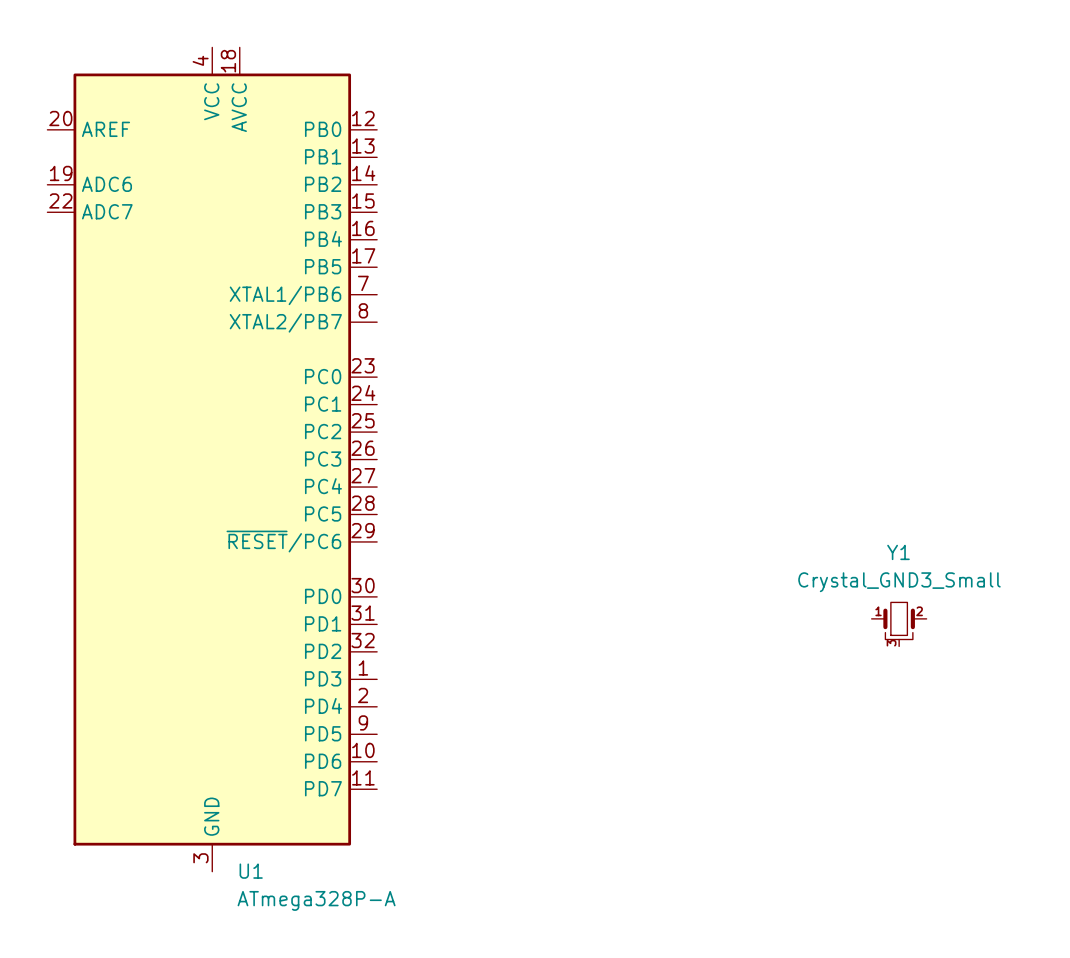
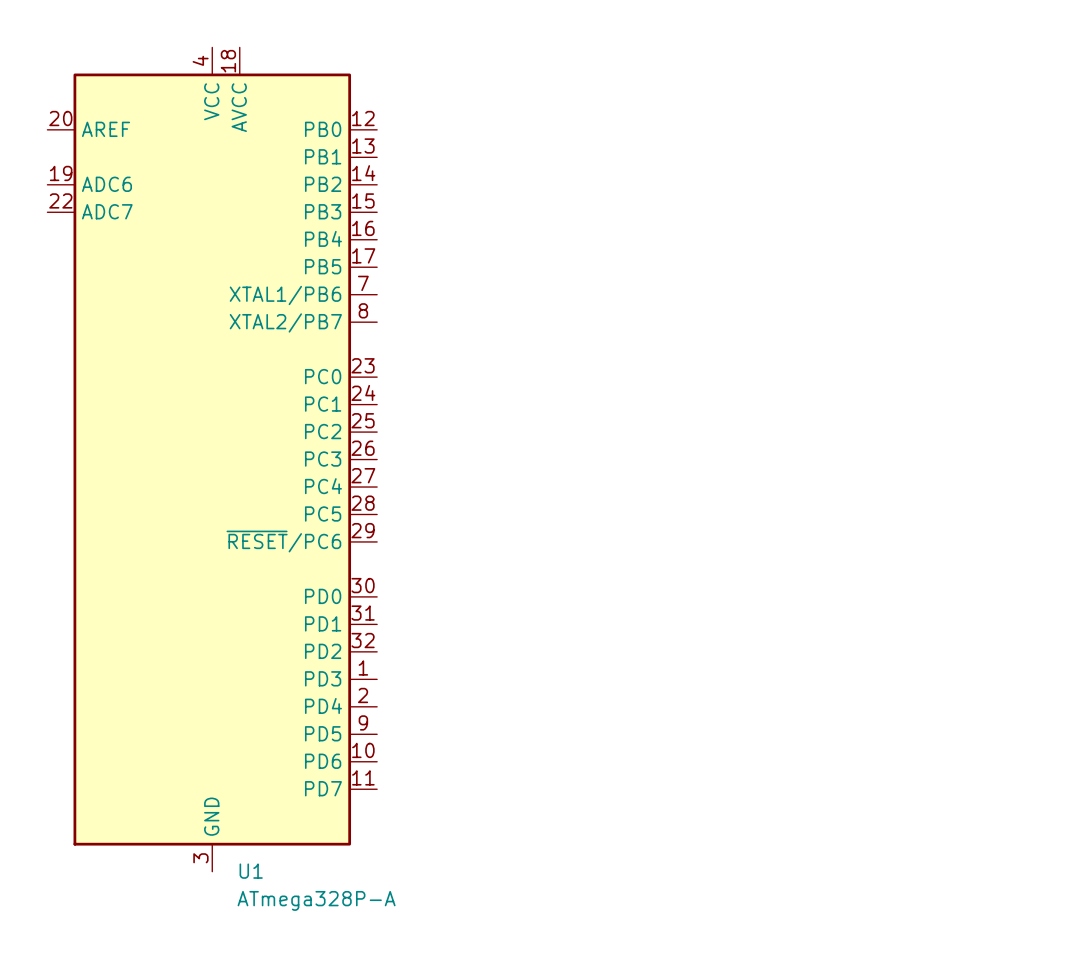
Y1: Crystal_GND3_Small (899, 624) -> none

